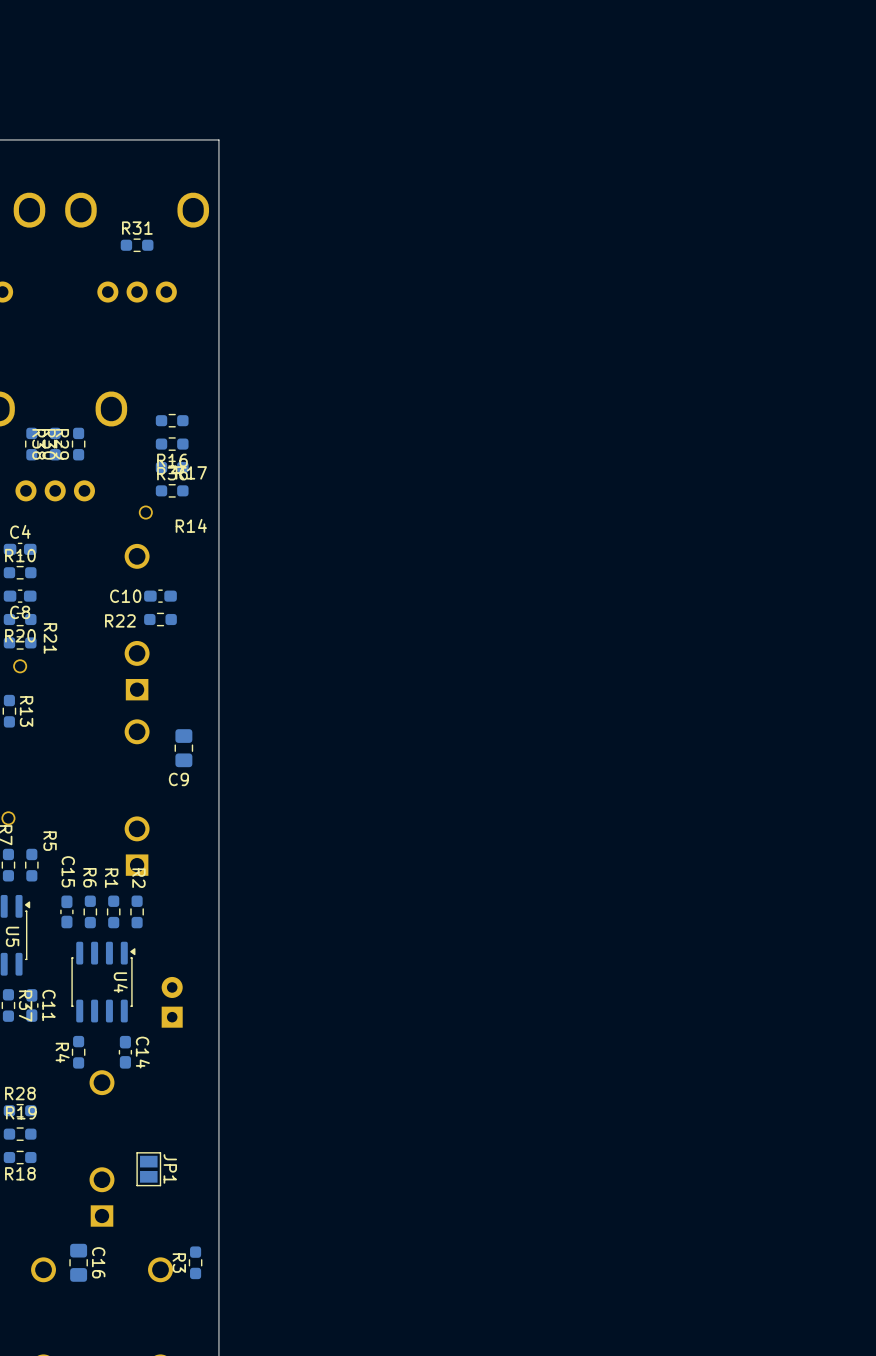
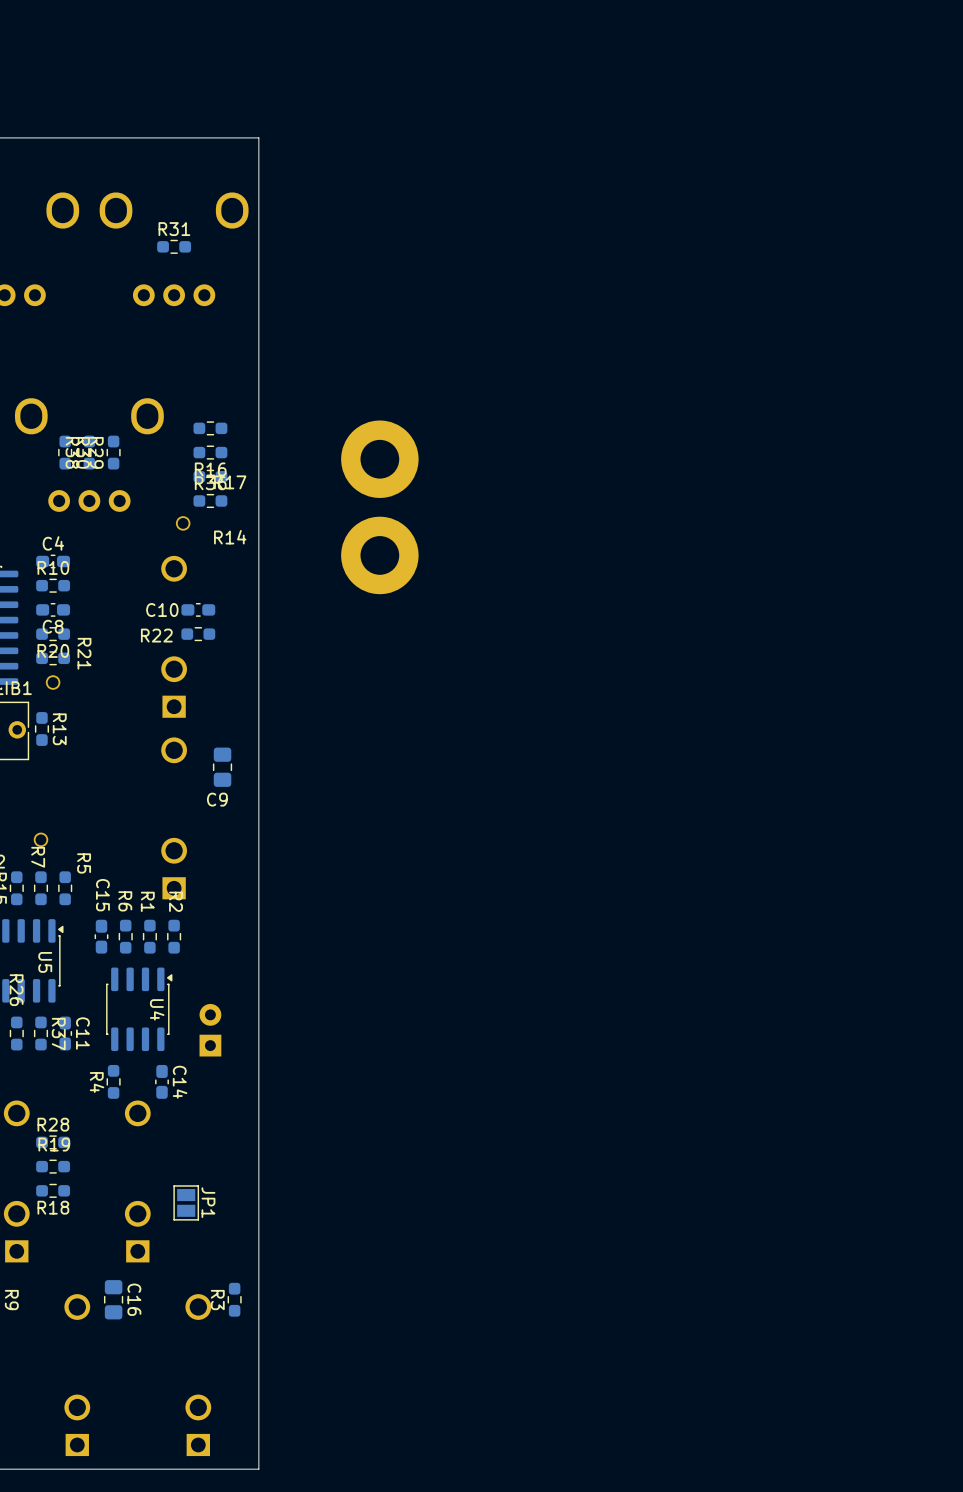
part: none -> (379, 459)
part: none -> (379, 555)

